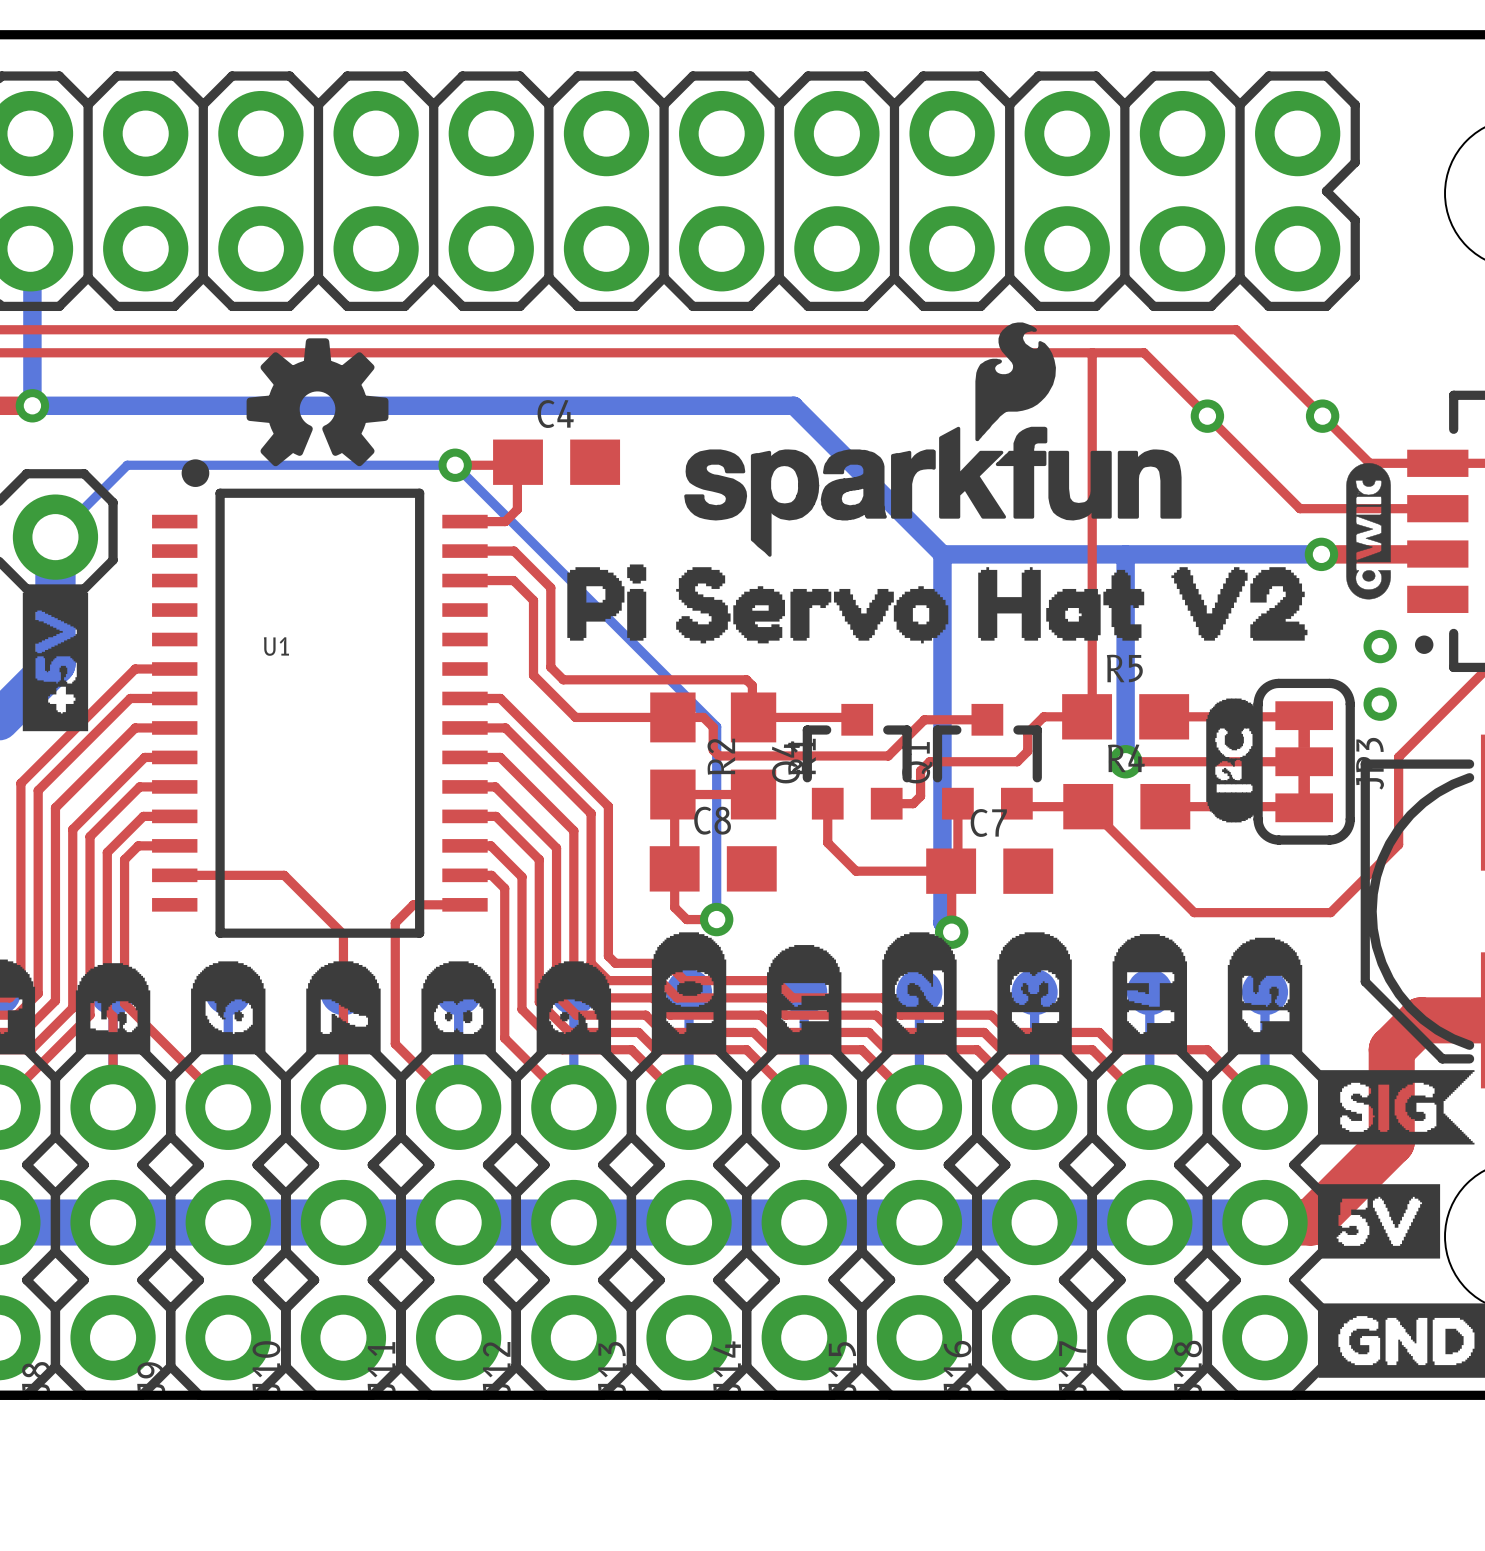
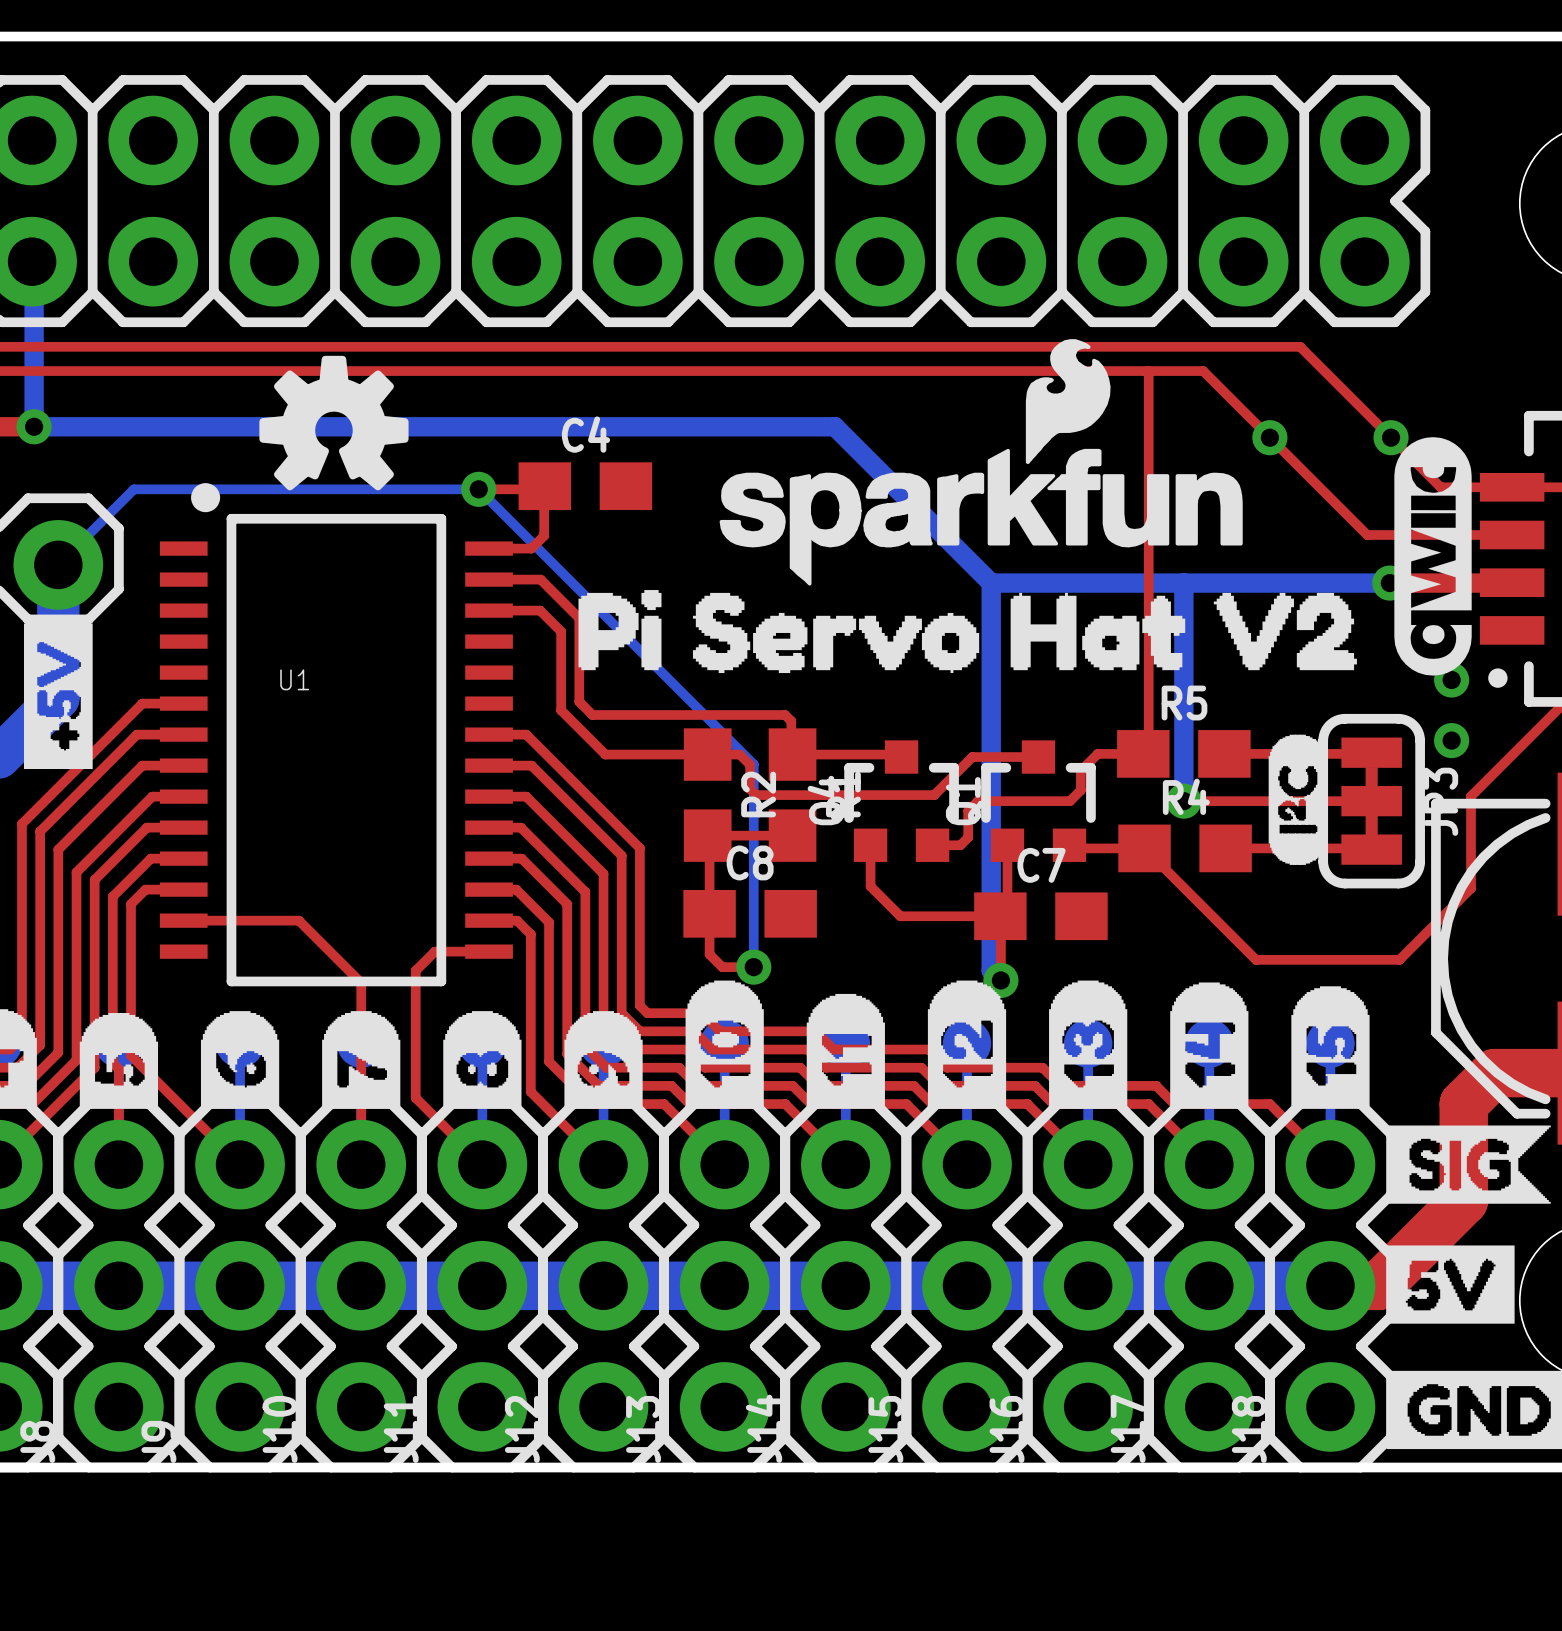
drawing shape: [1346, 463, 1391, 600] -> [1394, 437, 1472, 676]
drawing position: (937, 603) -> (967, 631)

